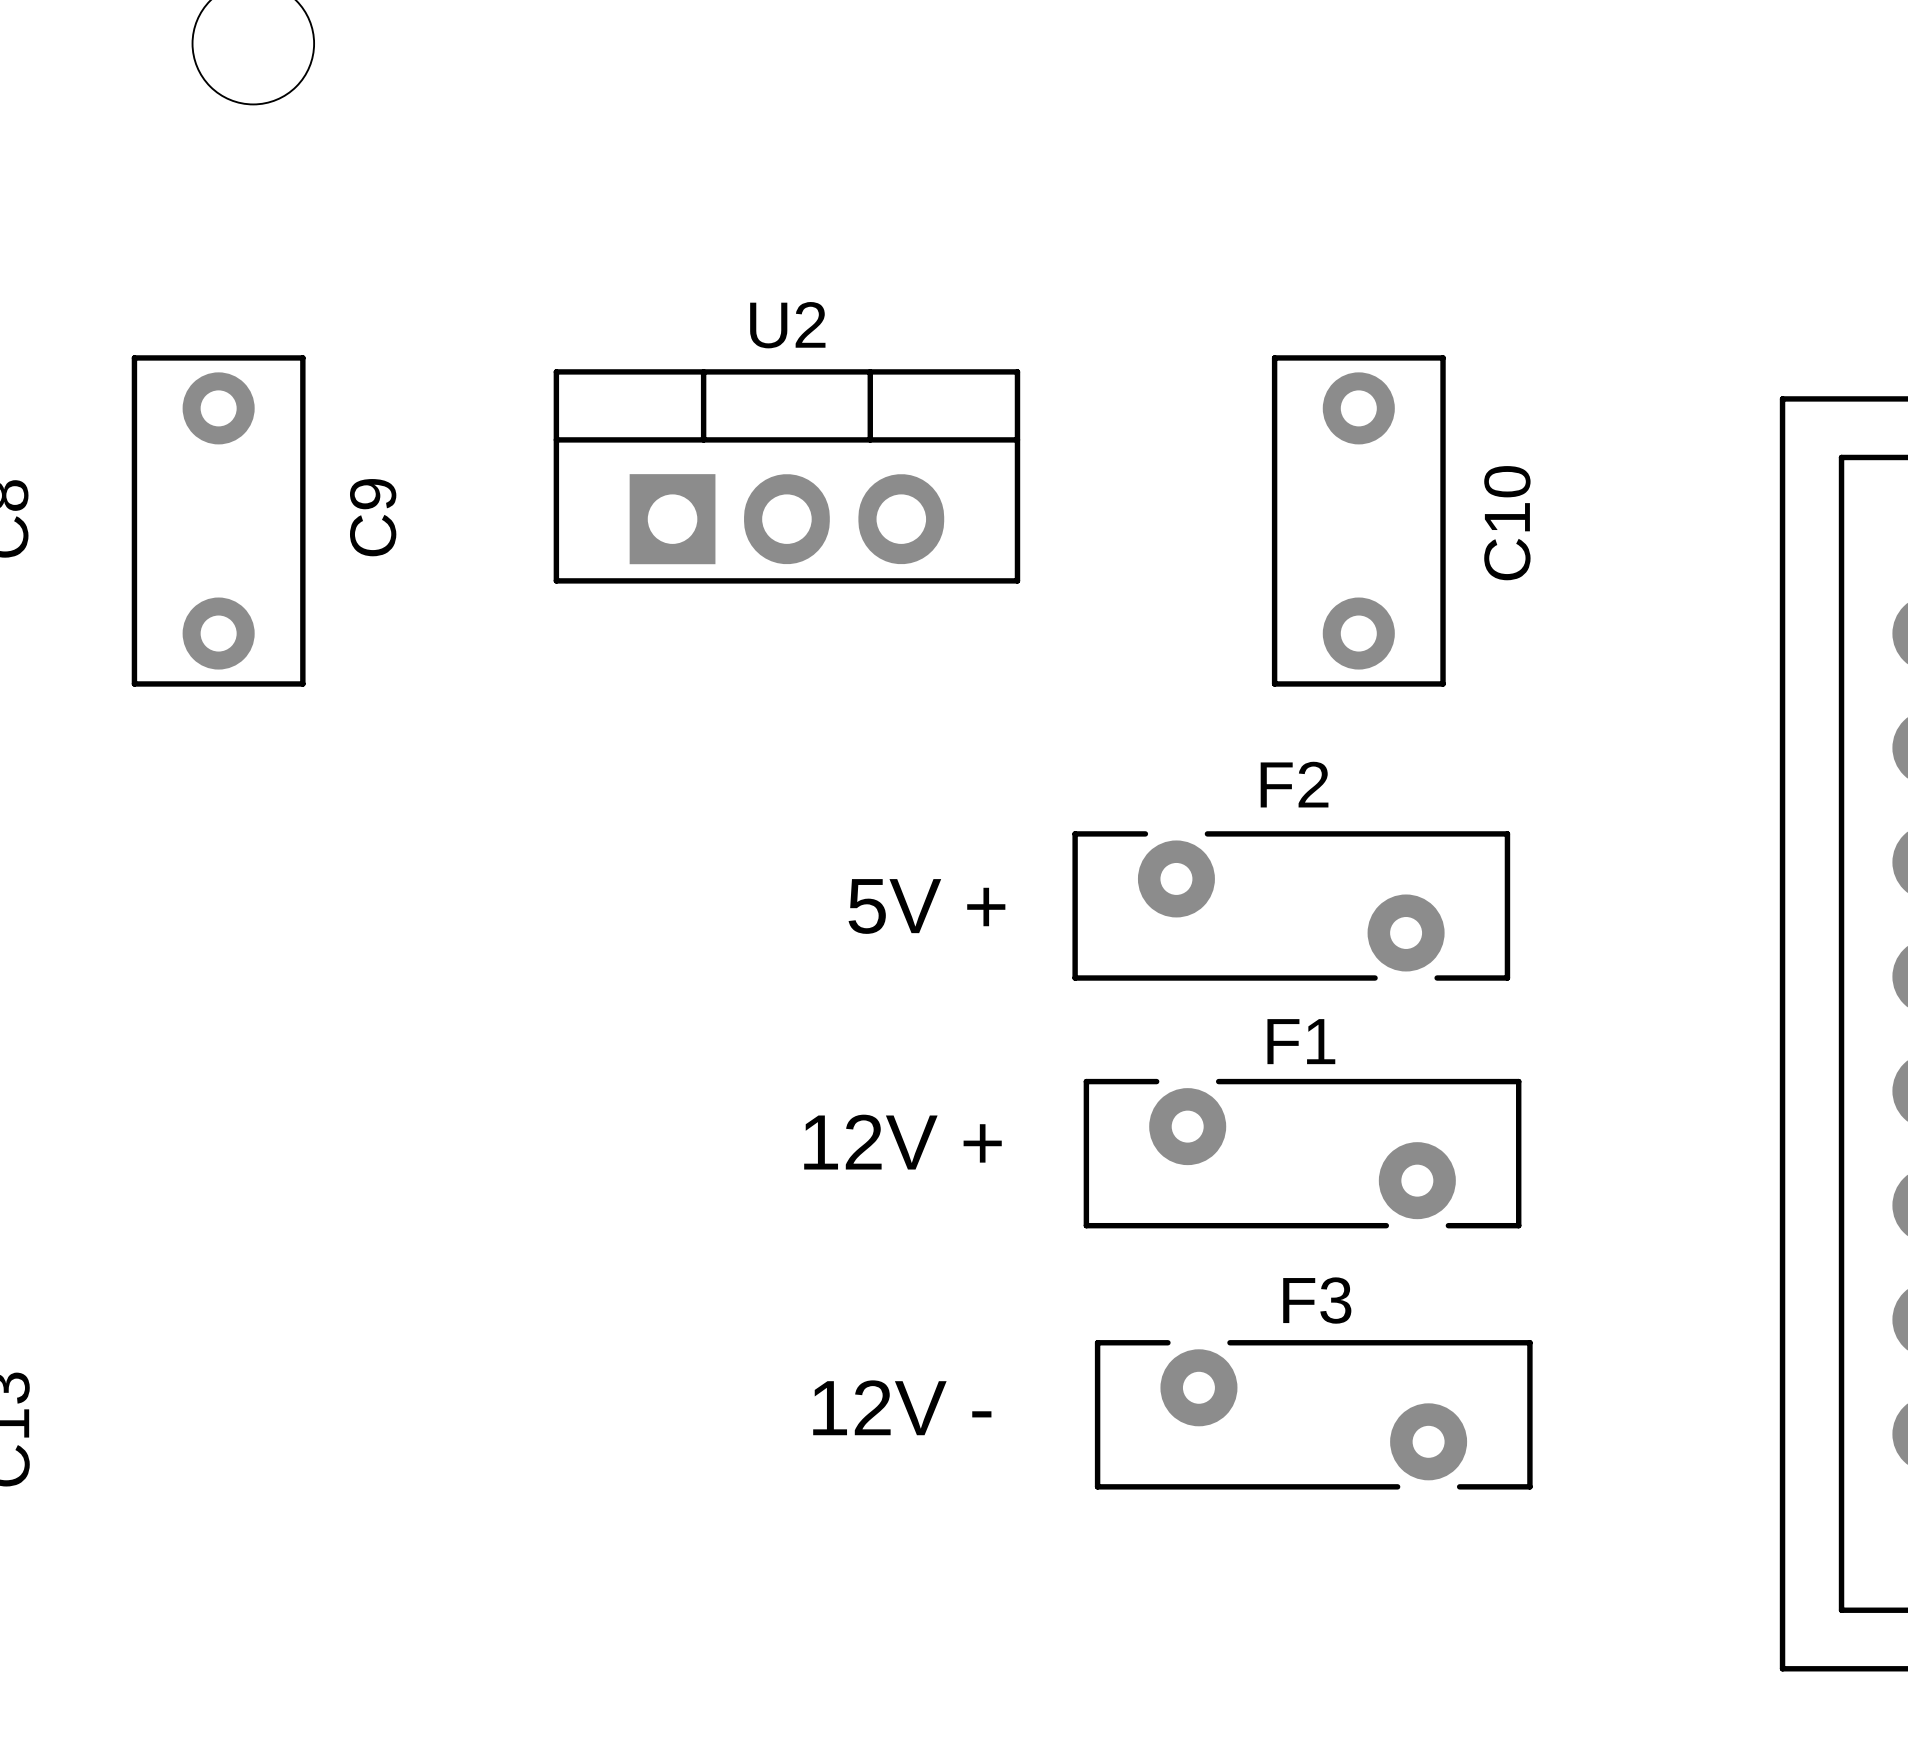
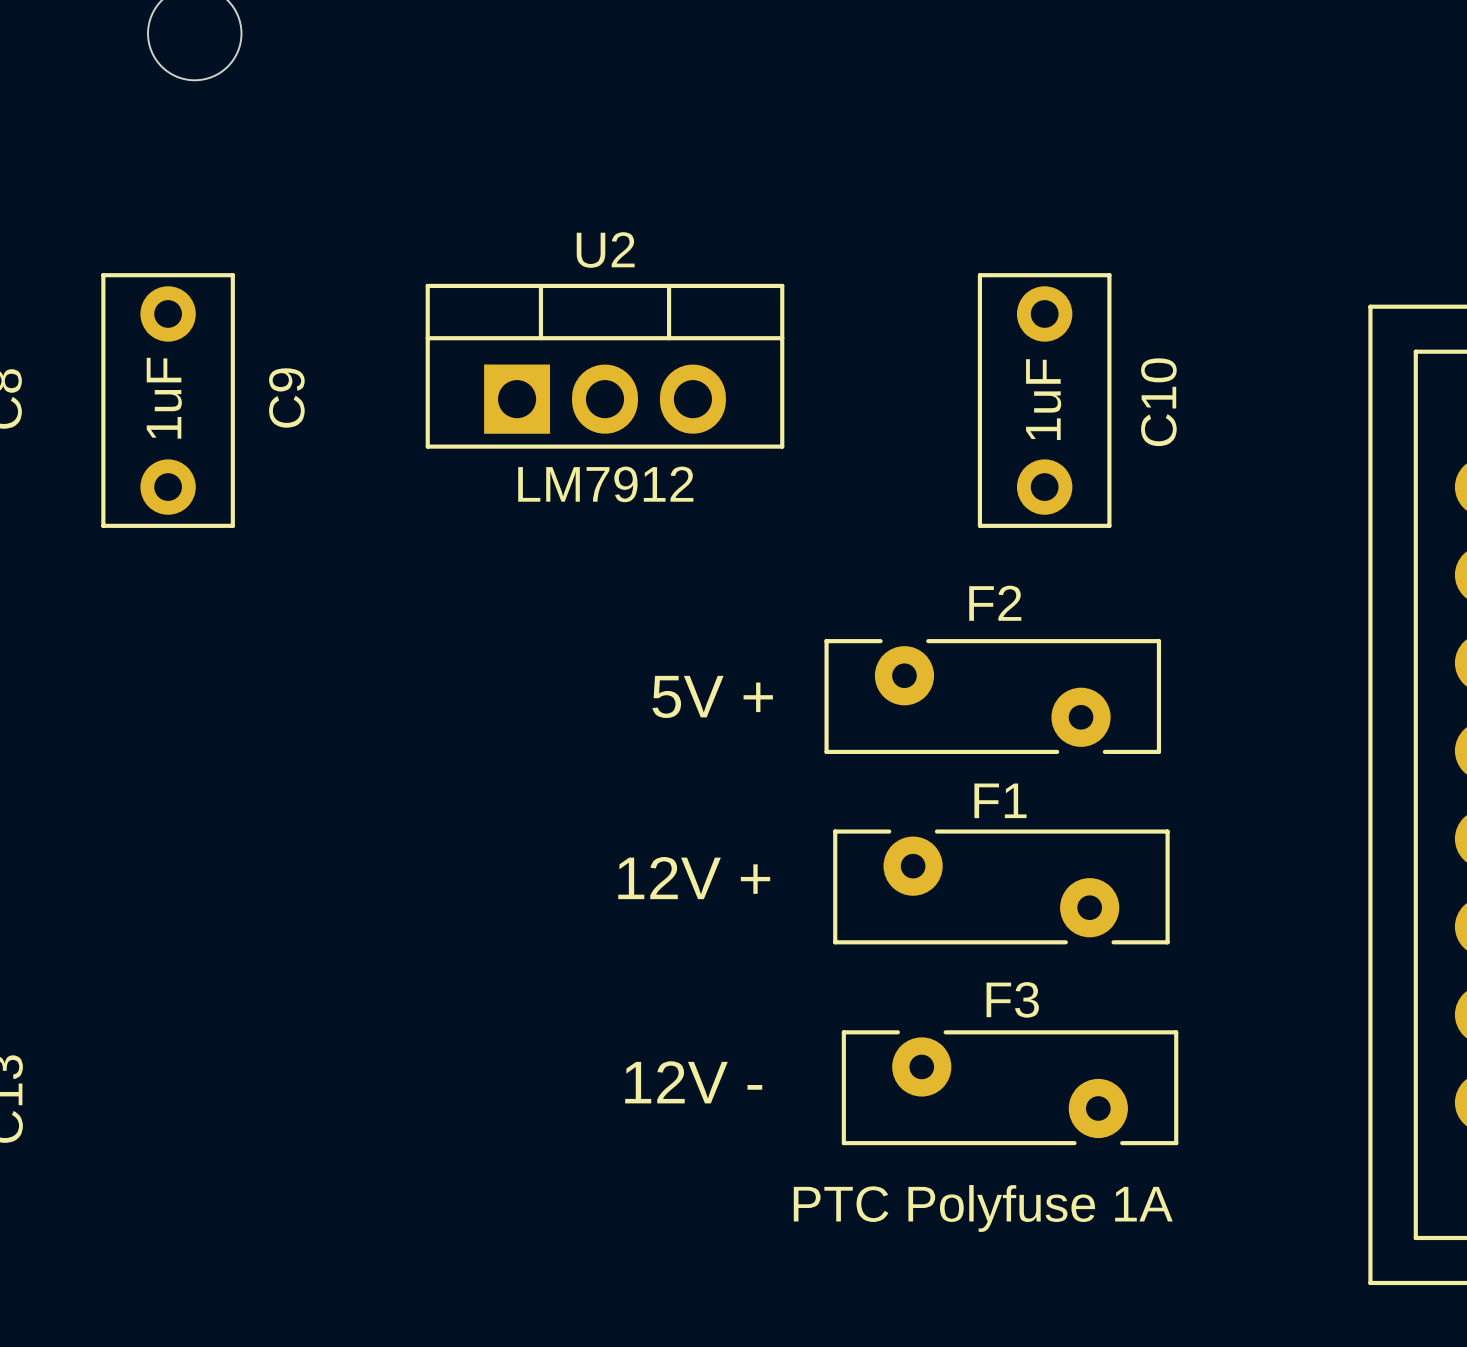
C9 value: none -> 1uF (164, 398)
C10 value: none -> 1uF (1043, 399)
U2 value: none -> LM7912 (605, 484)
text: none -> PTC Polyfuse 1A (983, 1208)

